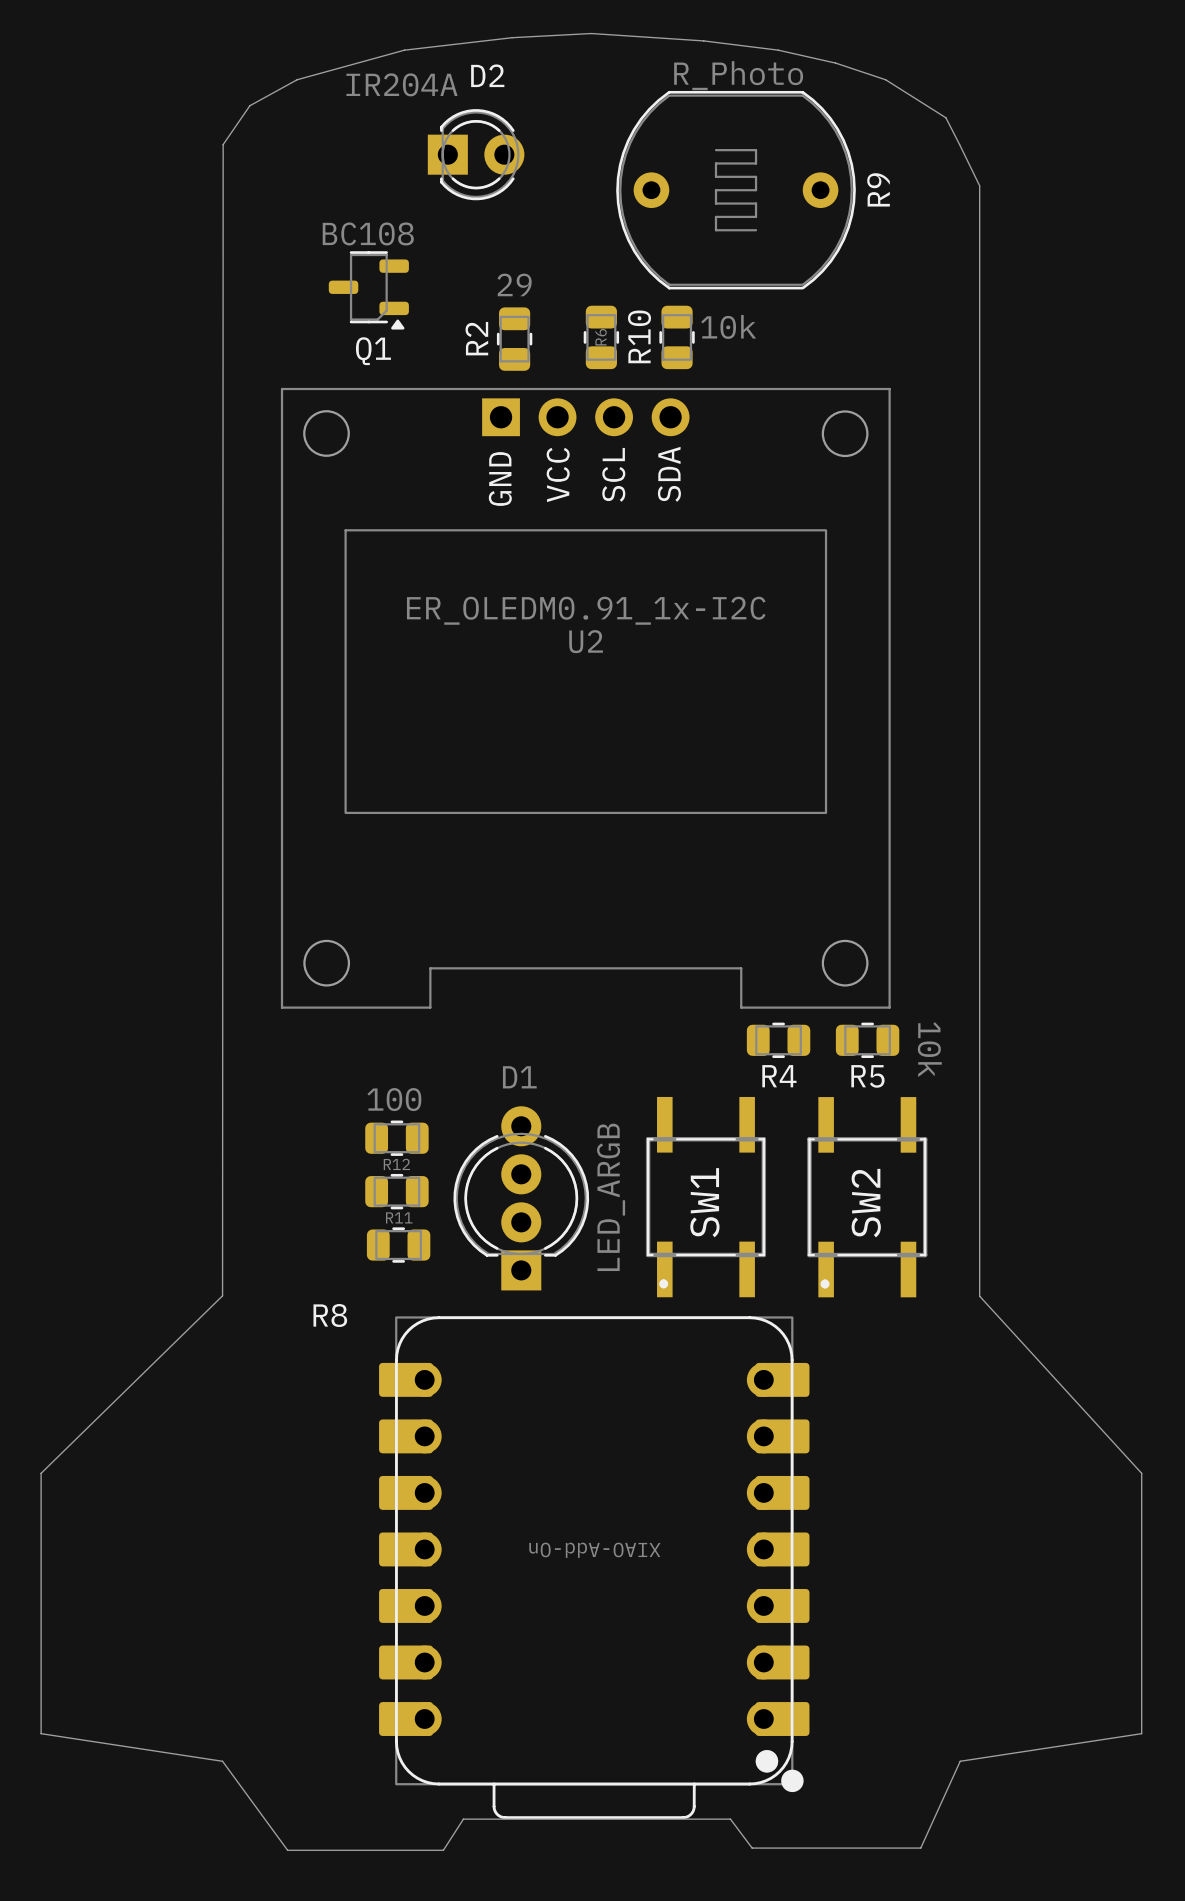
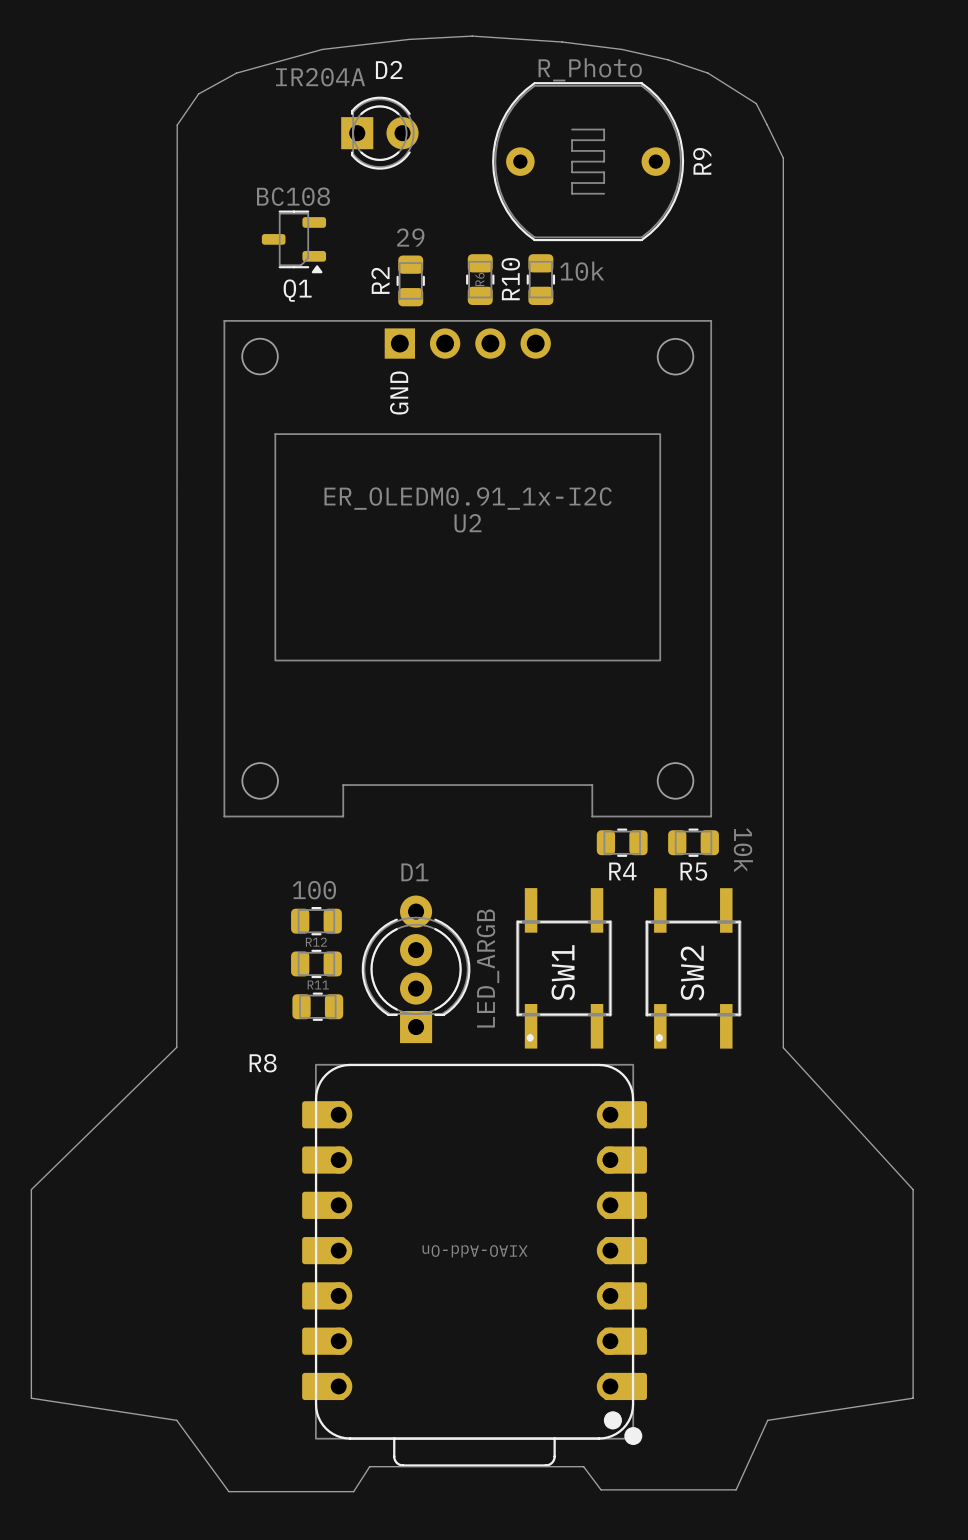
U2 text: VCC (558, 474) -> none
U2 text: SCL (613, 474) -> none
U2 text: SDA (669, 474) -> none

